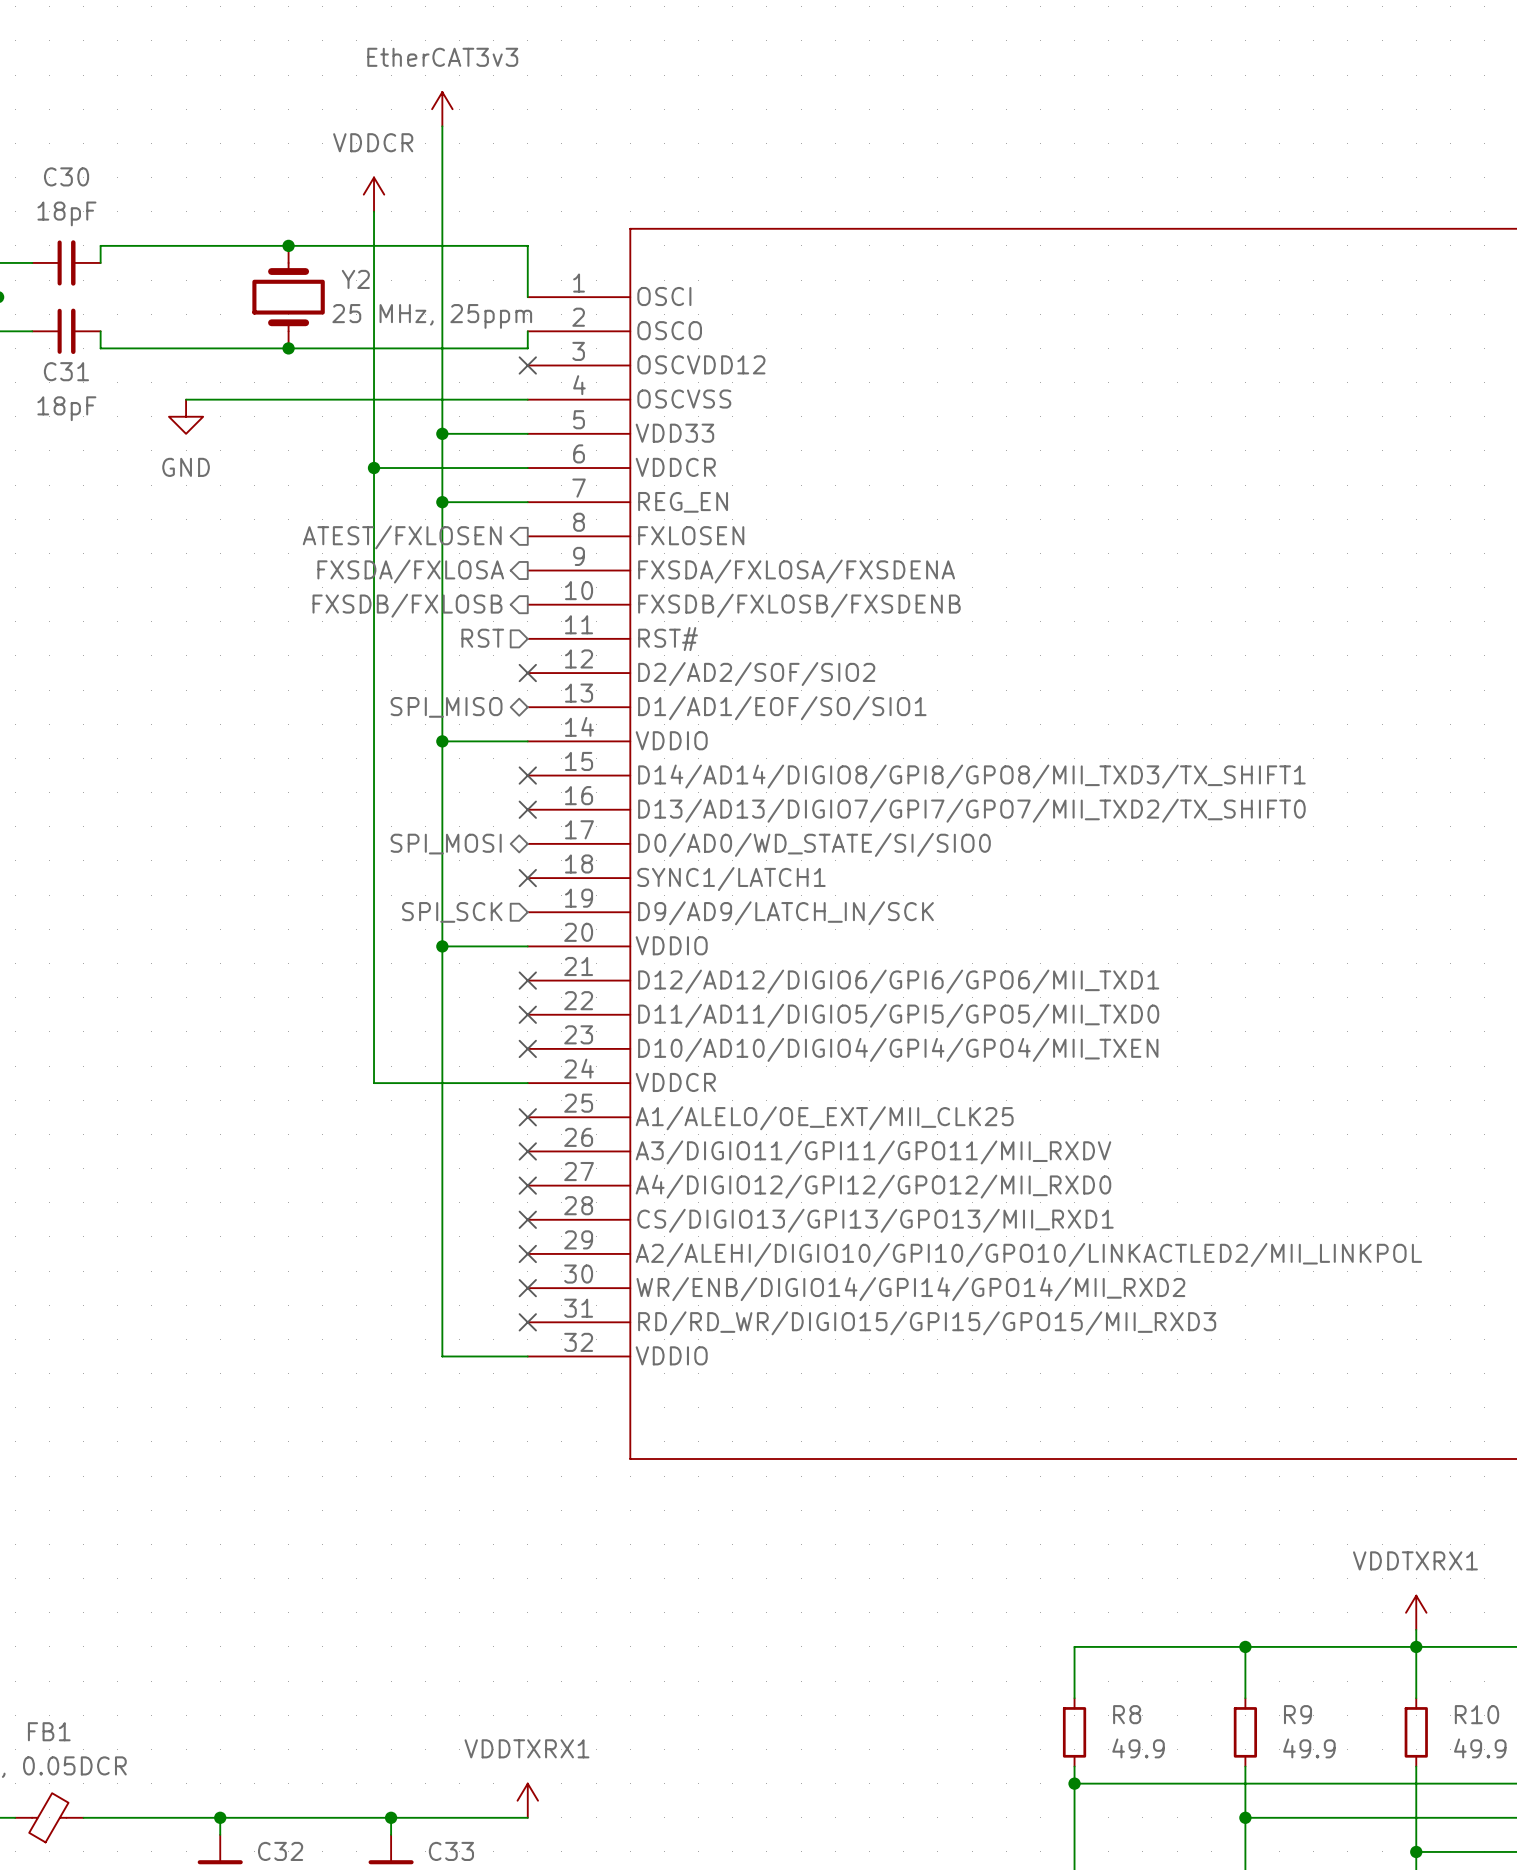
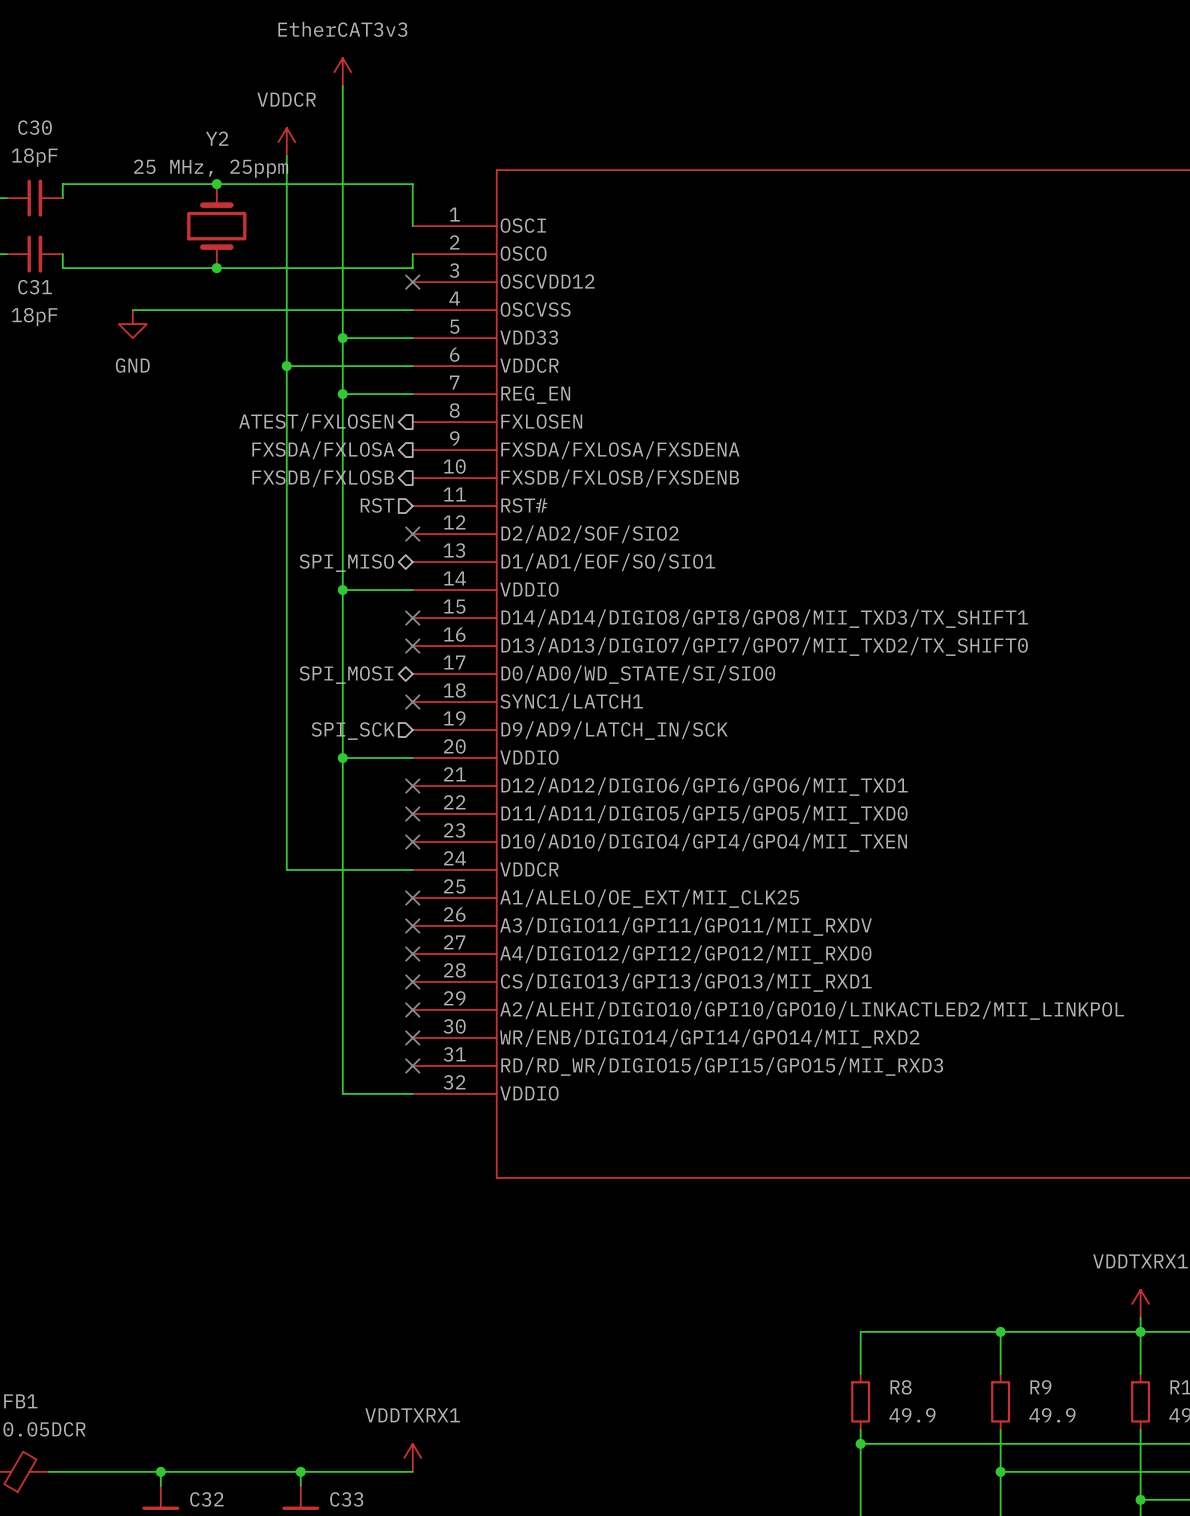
Y2 name position: Y2 (355, 279) -> Y2 (217, 138)
Y2 value position: 25 MHz, 25ppm (432, 316) -> 25 MHz, 25ppm (211, 168)

